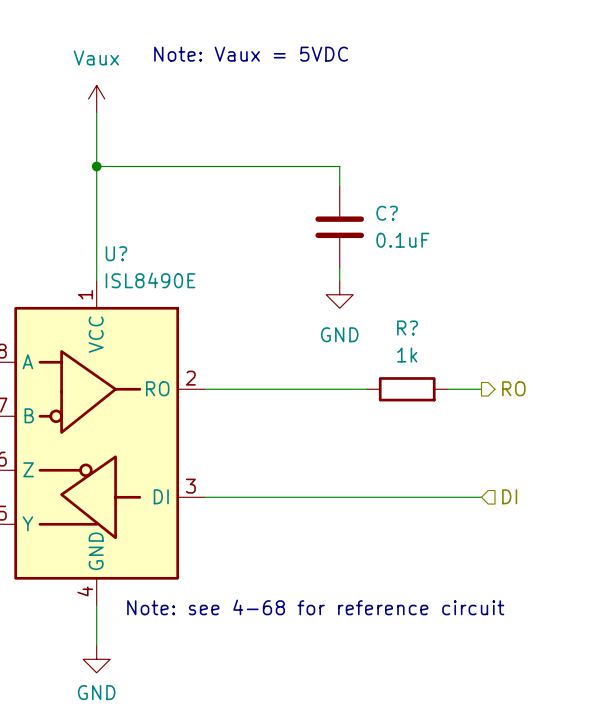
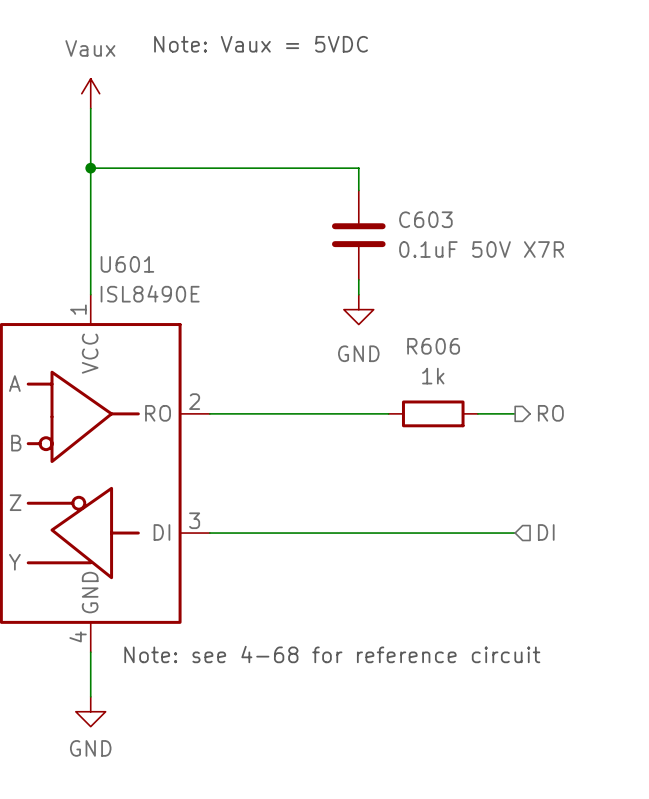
C? name: C? (387, 213) -> C603 (425, 219)
C? value: 0.1uF (402, 240) -> 0.1uF 50V X7R (481, 249)
U? name: U? (116, 253) -> U601 (127, 264)
R? name: R? (407, 328) -> R606 (433, 346)

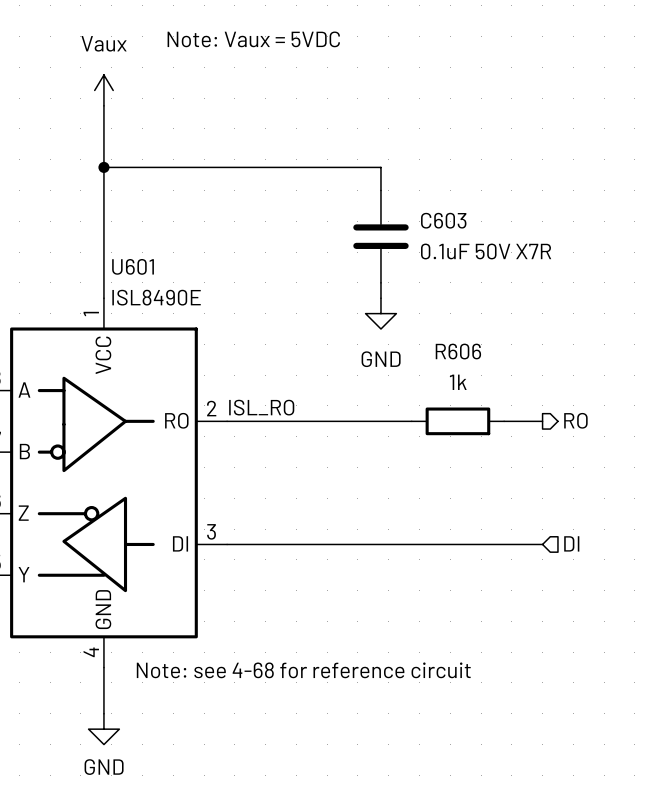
label: none -> ISL_RO (261, 407)

